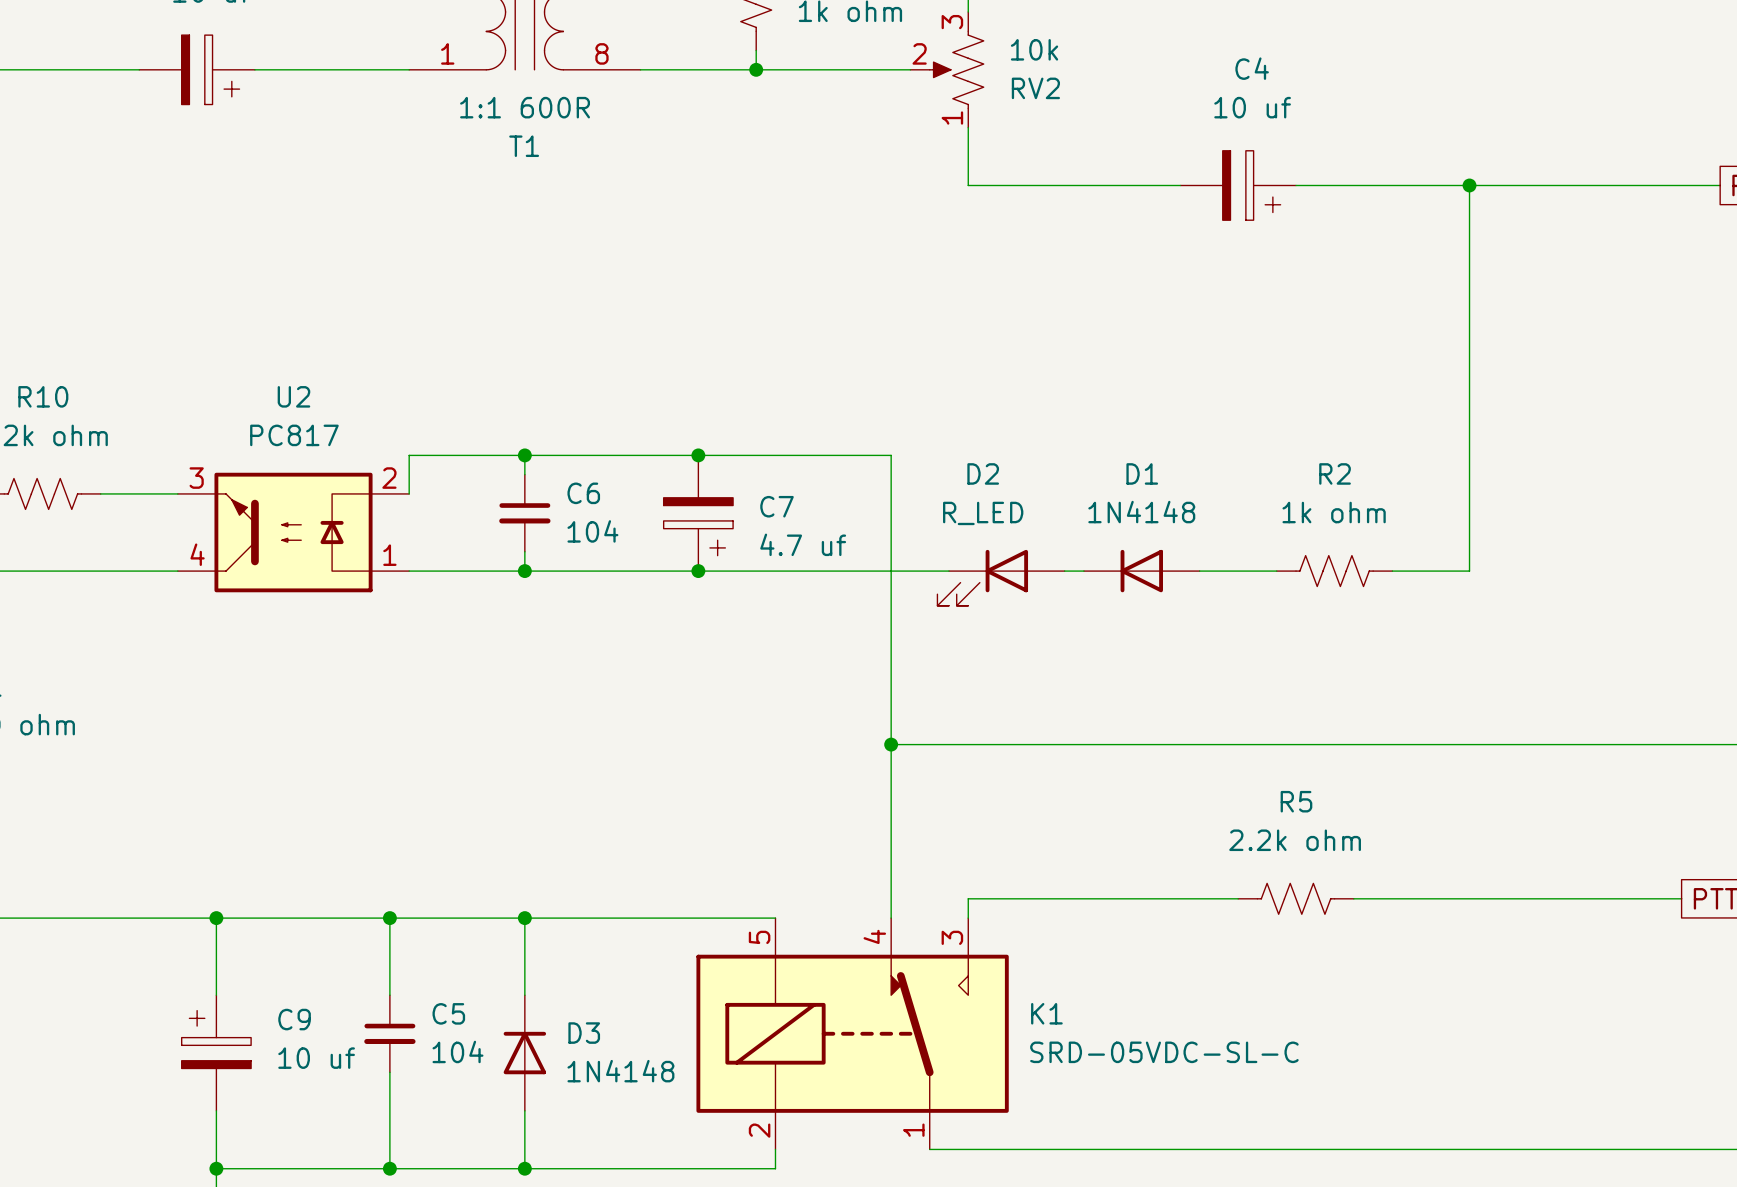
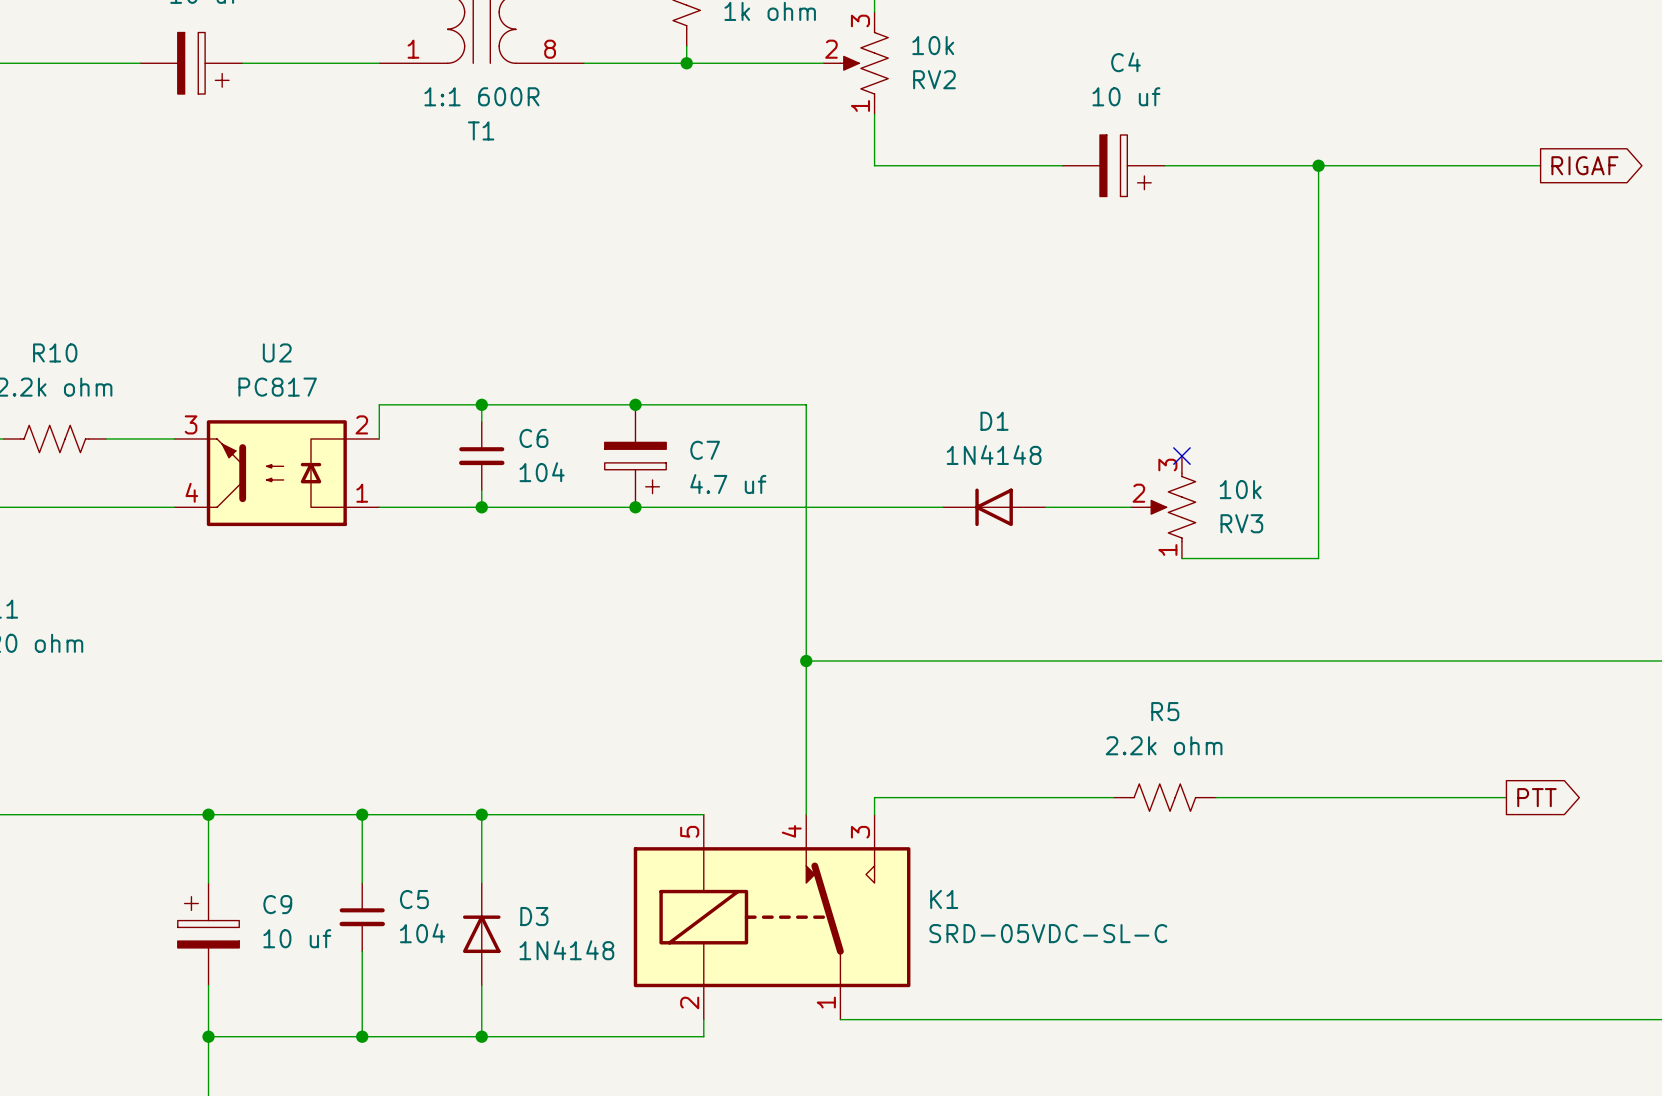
no-connect mark: none -> (1181, 456)
D1 position: (1141, 571) -> (994, 507)
RV3: none -> 10k (1163, 507)
R2: 1k ohm (1334, 571) -> none
wire: (1392, 571) (1469, 571) -> (1181, 558) (1318, 558) (1318, 507)
D2: R_LED (1001, 577) -> none

